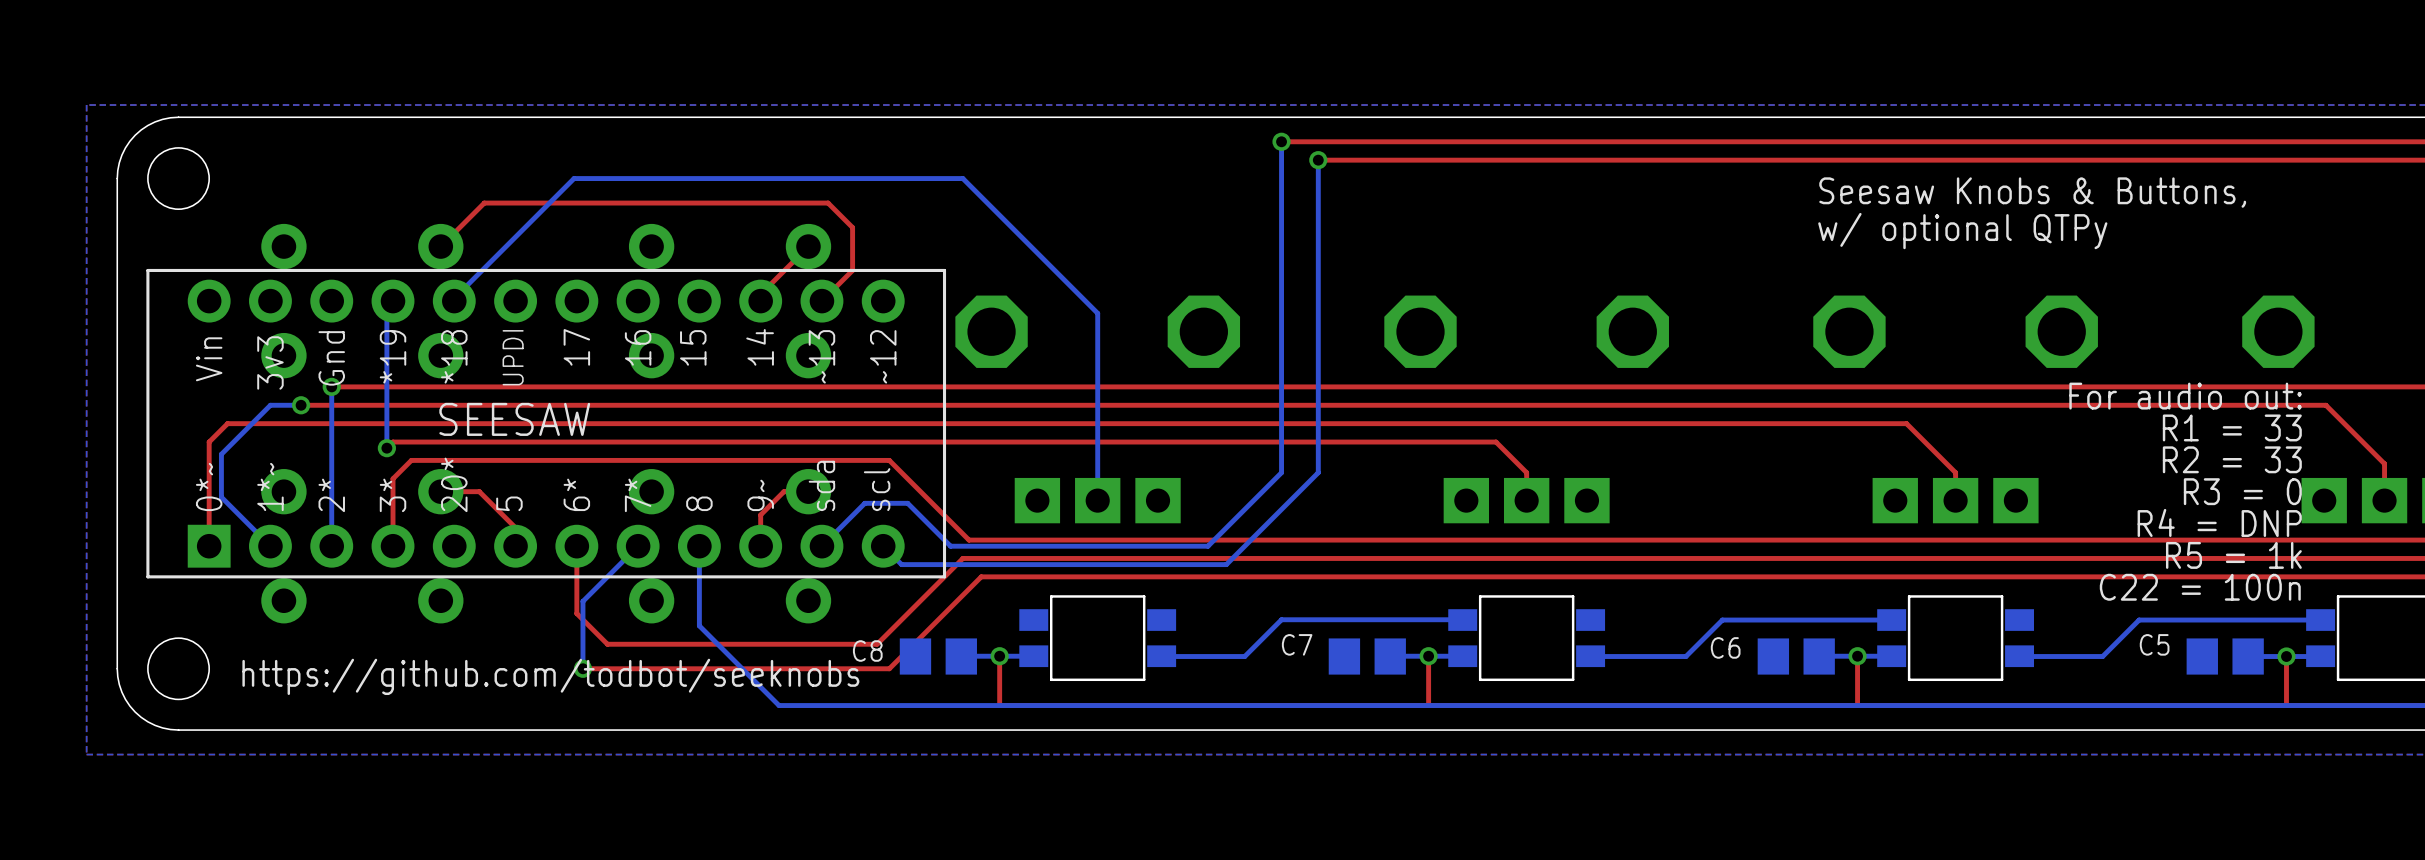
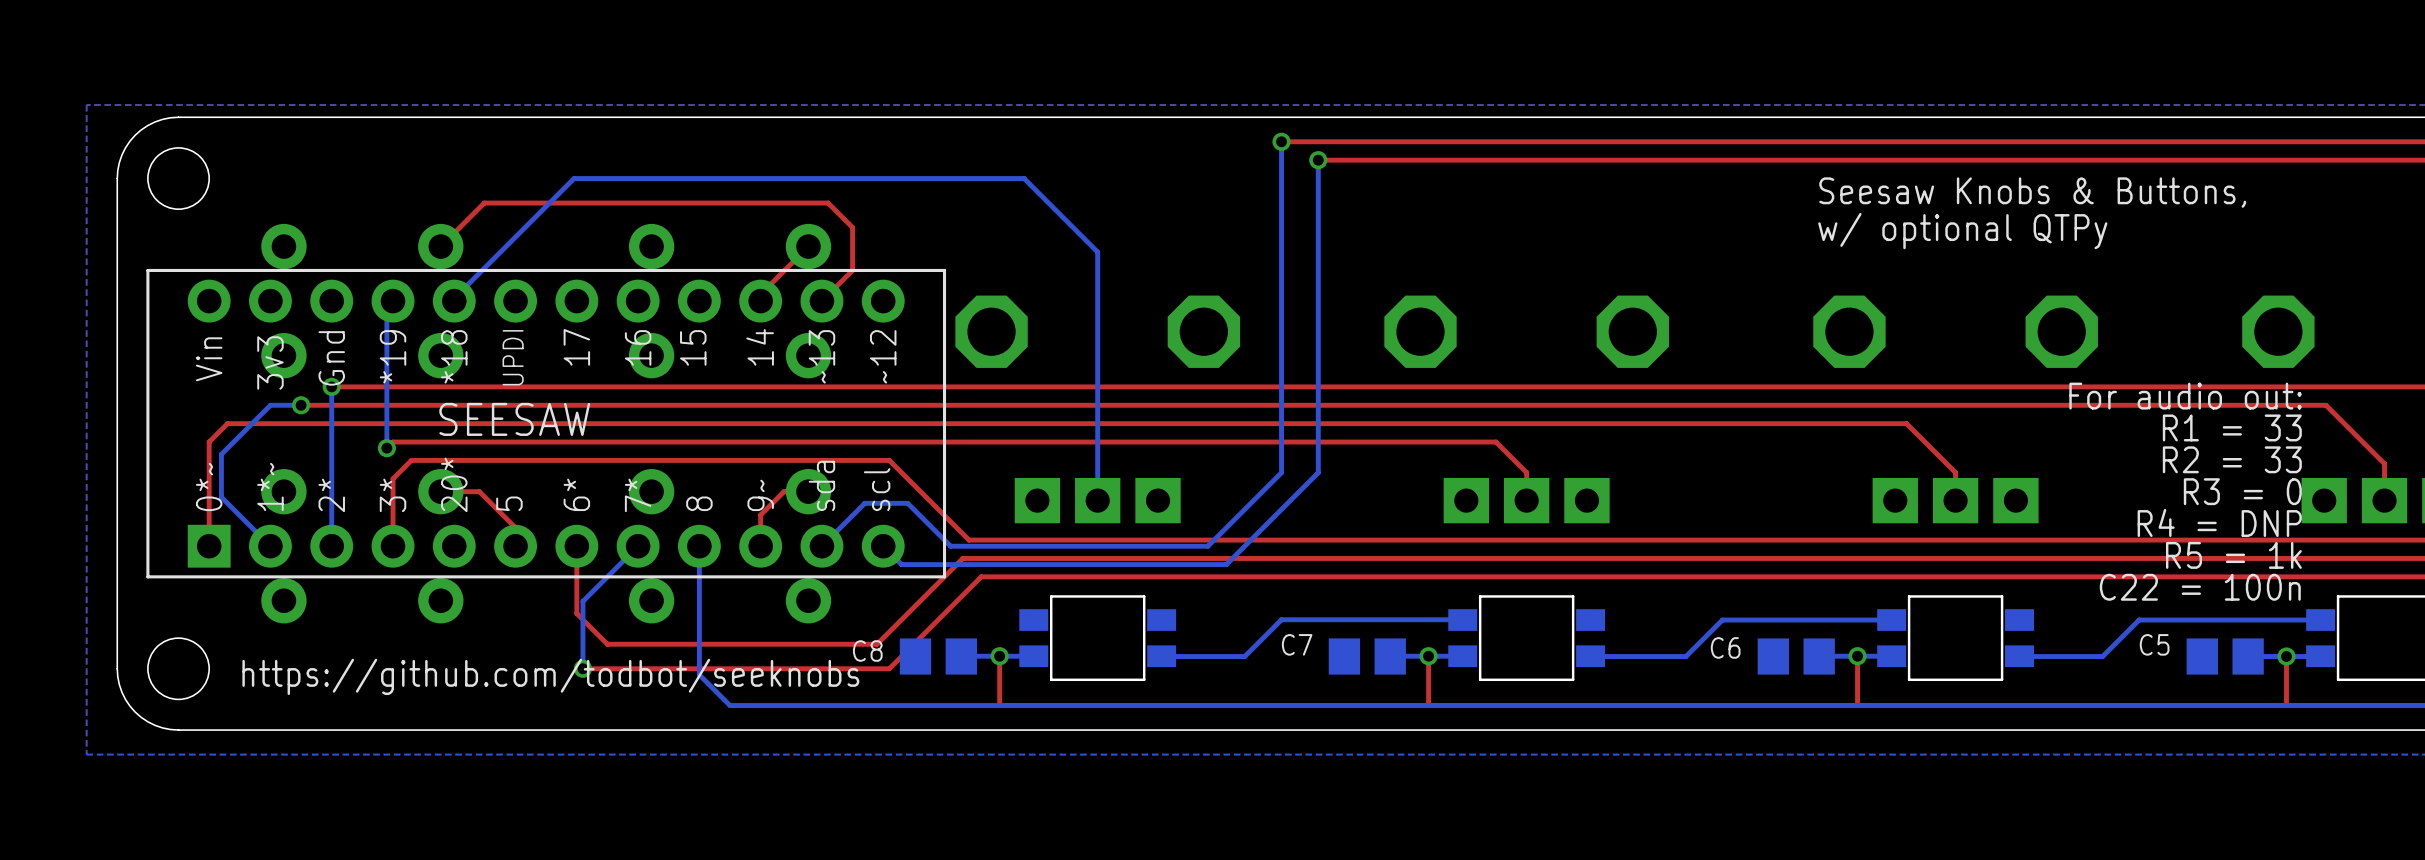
bottom track: (962, 178) (1097, 313) -> (962, 178) (1024, 178) (1097, 252) (1097, 313)
bottom track: (699, 625) (779, 705) -> (699, 625) (699, 674) (730, 705) (779, 705)

